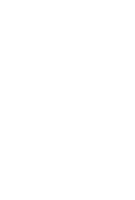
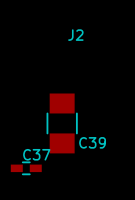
J2: none -> (75, 35)
C39: none -> (62, 123)
C37: none -> (26, 168)

